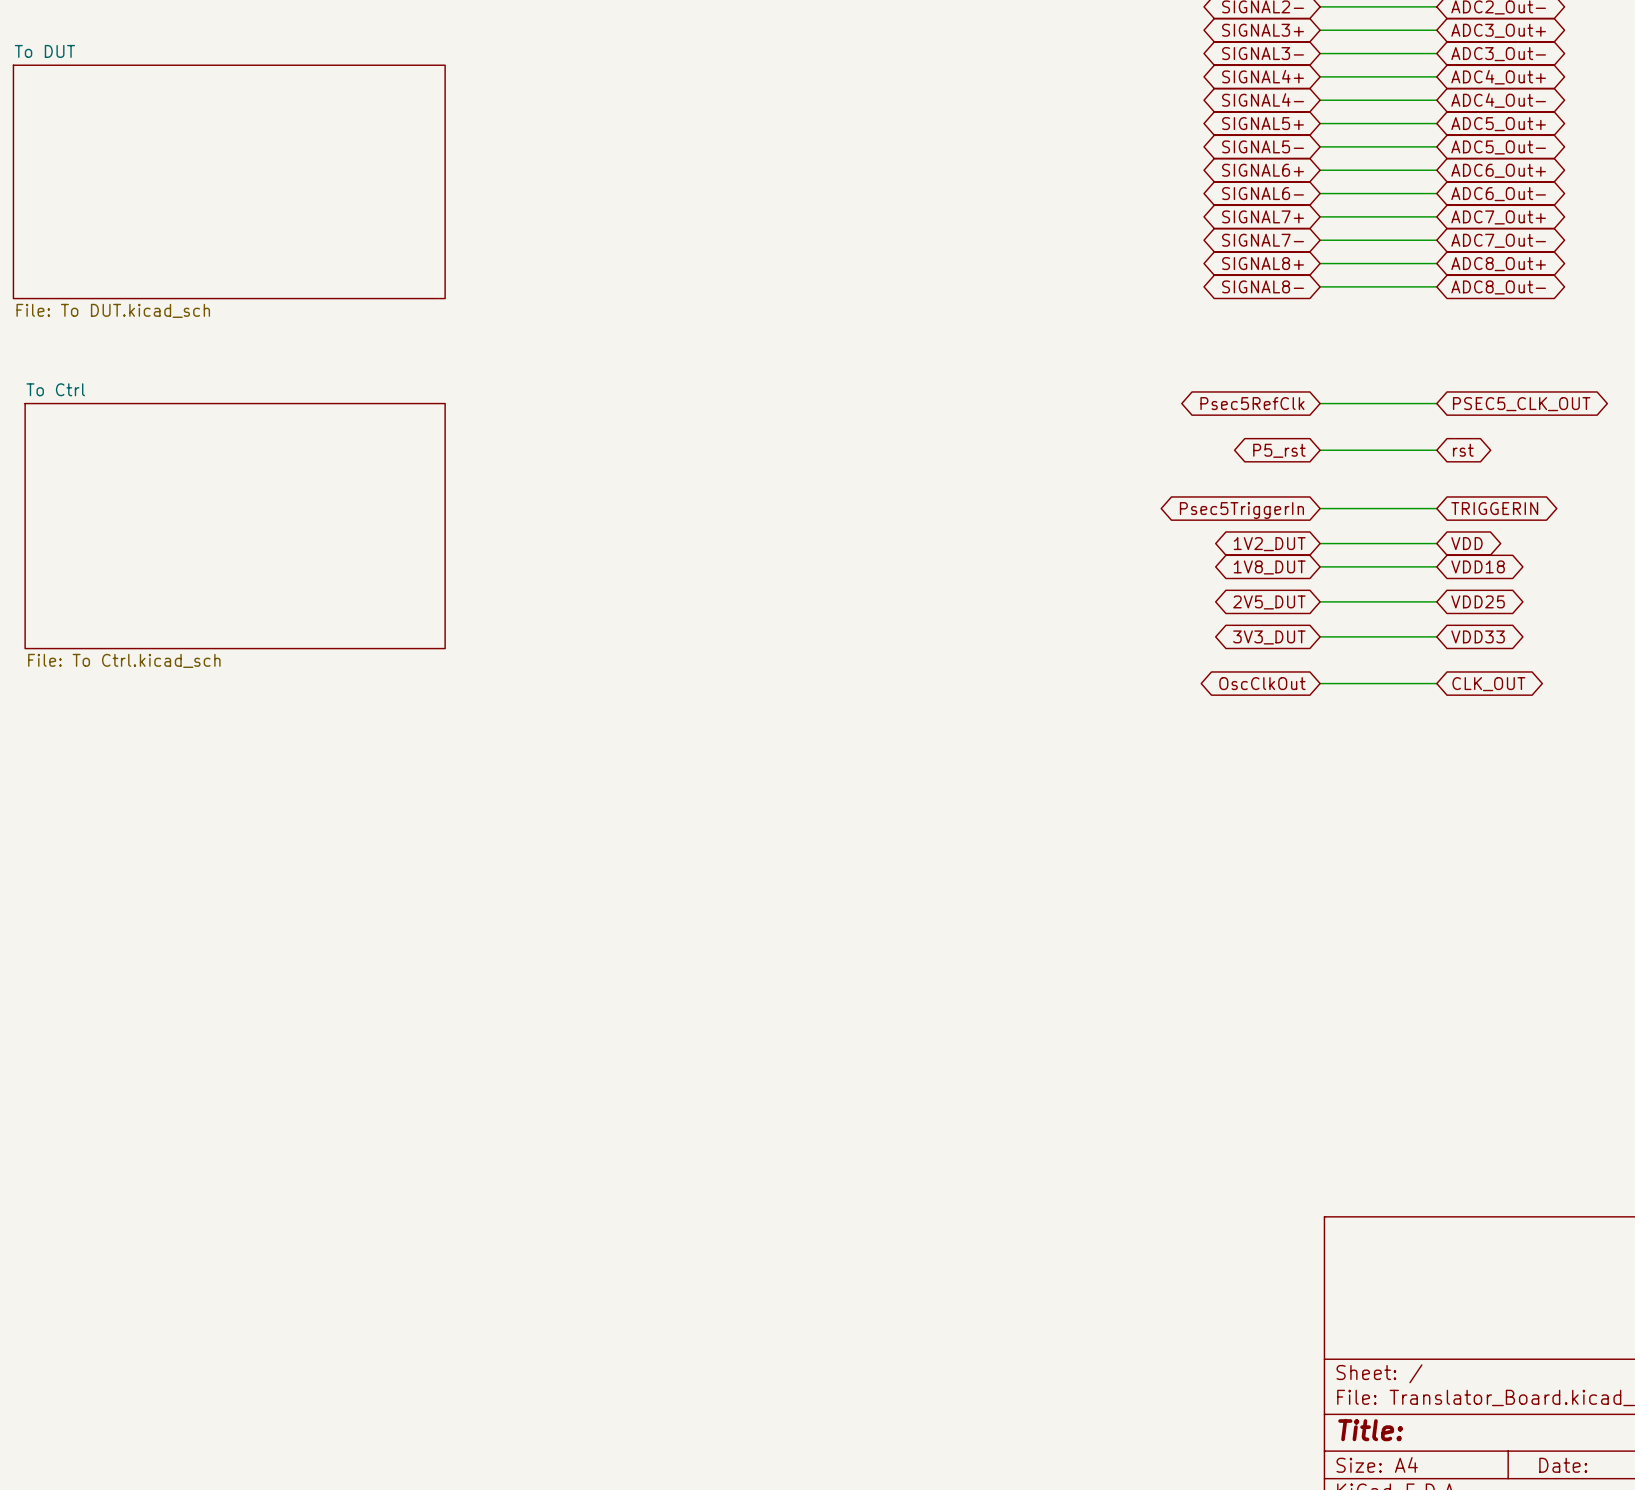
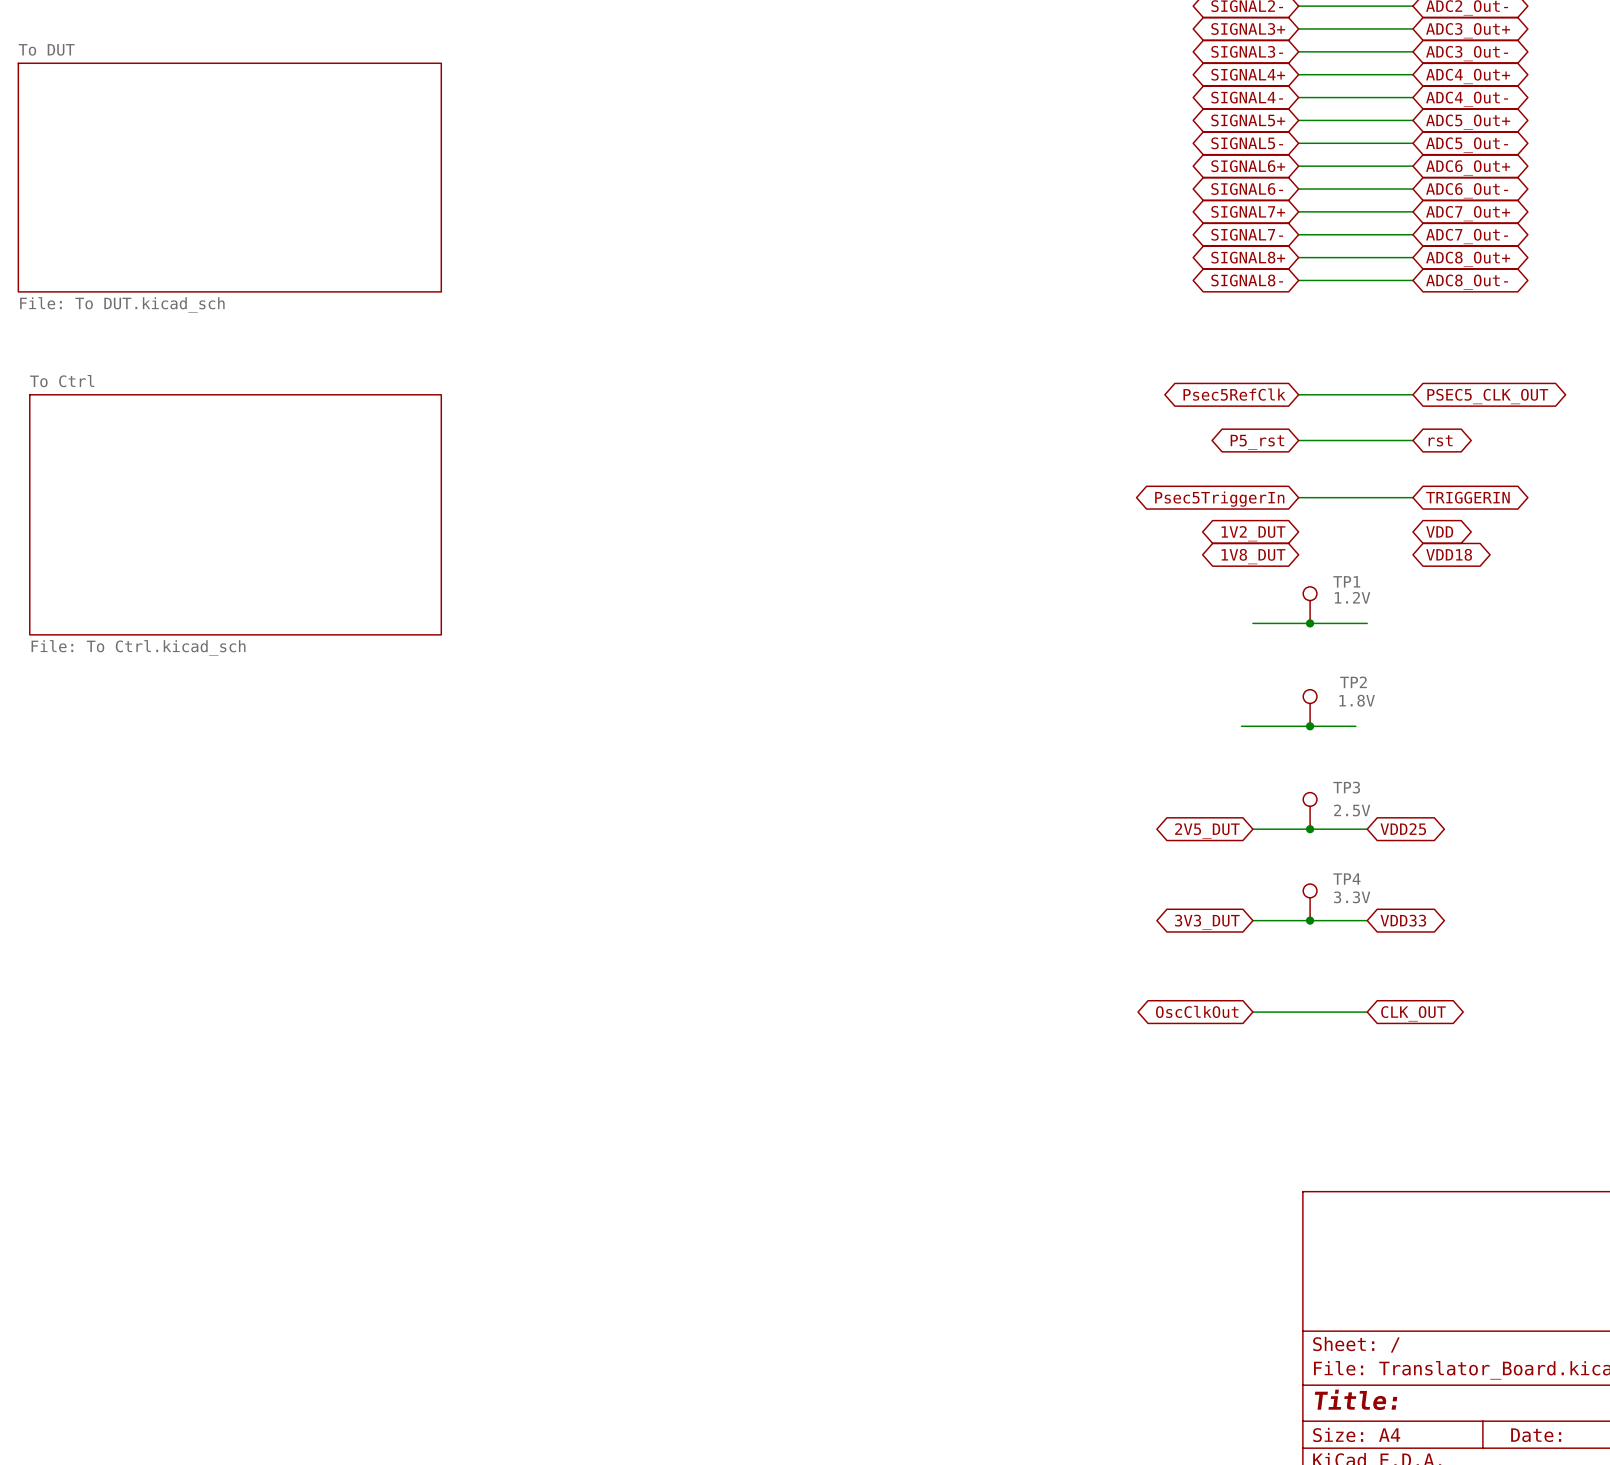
wire: (1320, 543) (1436, 543) -> none
wire: (1320, 566) (1436, 566) -> none
wire: (1320, 601) (1436, 601) -> none
global label: VDD25 (1478, 601) -> none
global label: 2V5_DUT (1269, 602) -> none
TP1: none -> 1.2V (1310, 605)
junction: none -> (1310, 623)
wire: (1390, 636) (1436, 636) -> (1252, 623) (1298, 623)
global label: VDD33 (1478, 636) -> none
global label: 3V3_DUT (1269, 637) -> none
global label: OscClkOut (1262, 683) -> none
wire: (1320, 683) (1436, 683) -> (1241, 726) (1355, 726)
global label: CLK_OUT (1488, 684) -> none
TP2: none -> 1.8V (1310, 708)
junction: none -> (1310, 726)
TP3: none -> 2.5V (1310, 810)
wire: none -> (1252, 829) (1367, 829)
junction: none -> (1310, 829)
global label: none -> VDD25 (1403, 829)
global label: none -> 2V5_DUT (1207, 830)
TP4: none -> 3.3V (1310, 902)
global label: none -> 3V3_DUT (1207, 922)
wire: none -> (1252, 920) (1367, 920)
junction: none -> (1310, 920)
global label: none -> VDD33 (1403, 920)
global label: none -> OscClkOut (1197, 1011)
wire: none -> (1252, 1012) (1367, 1012)
global label: none -> CLK_OUT (1413, 1013)

